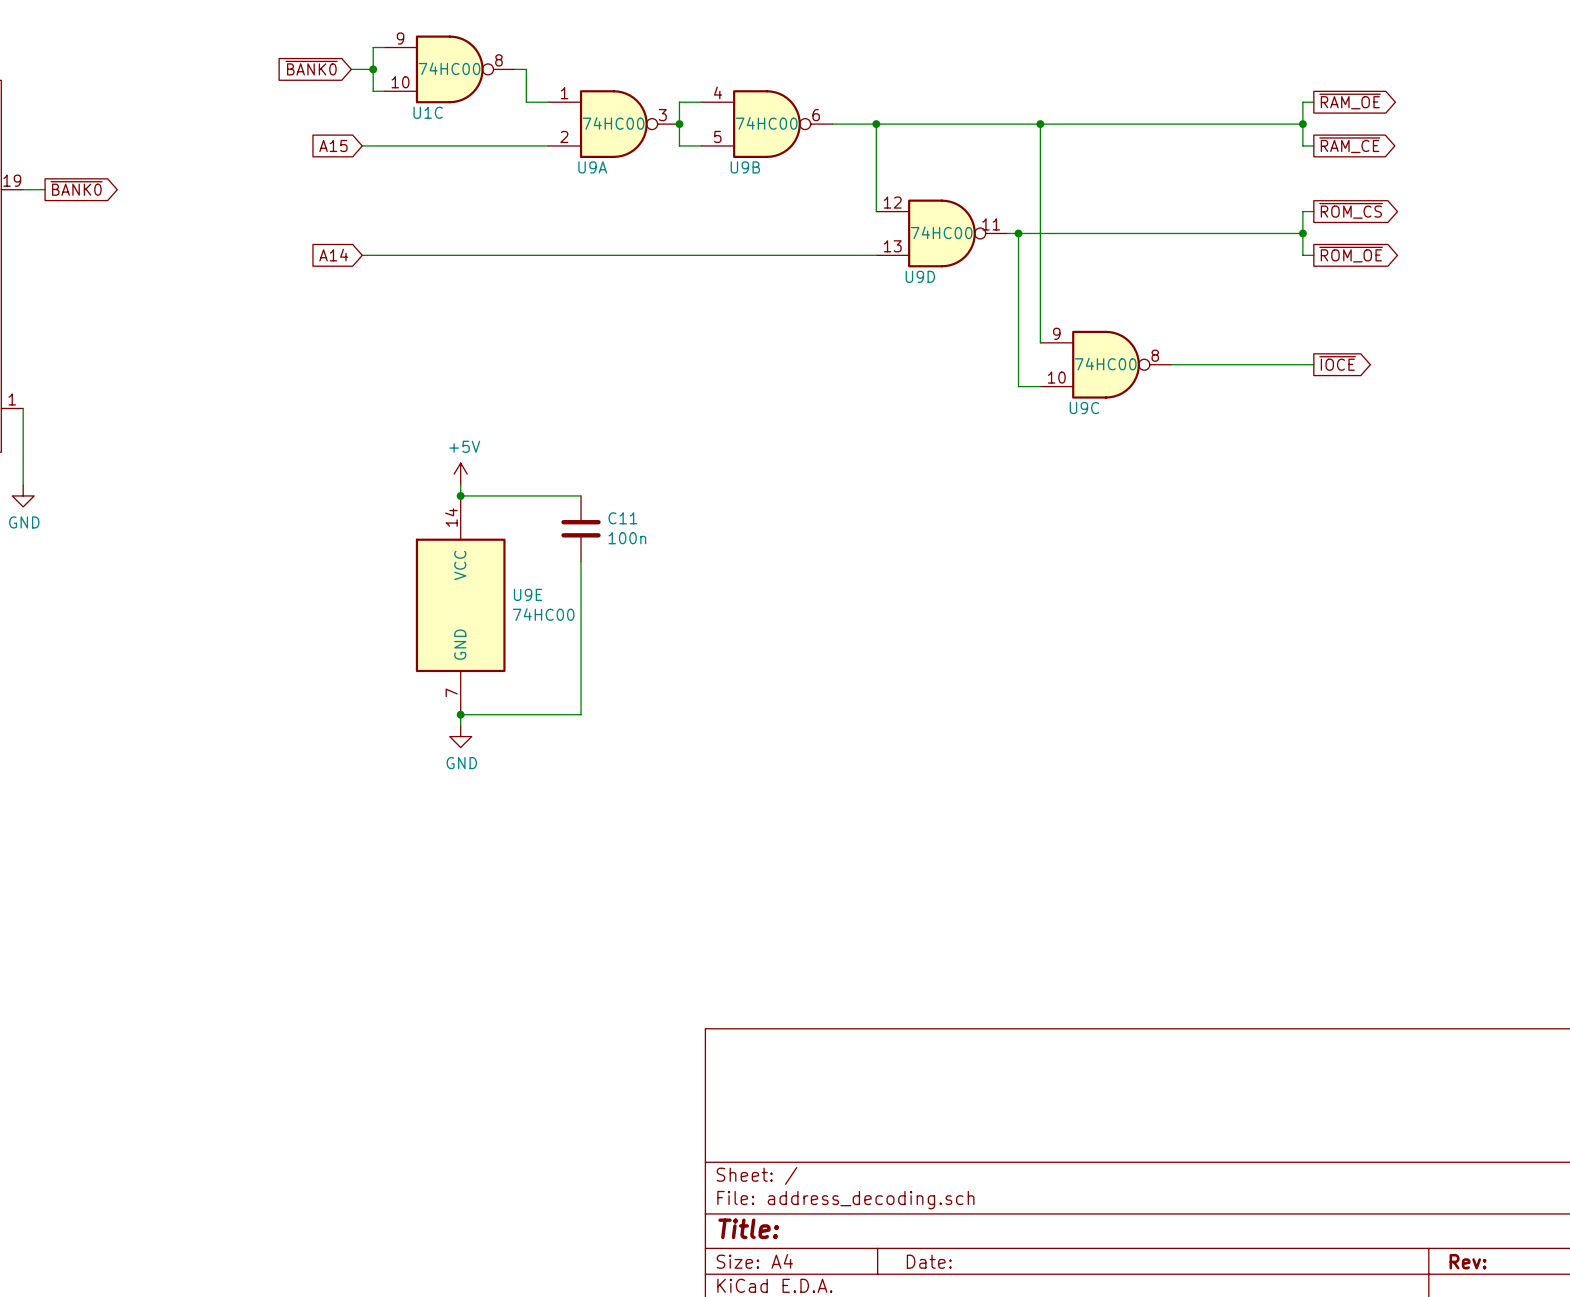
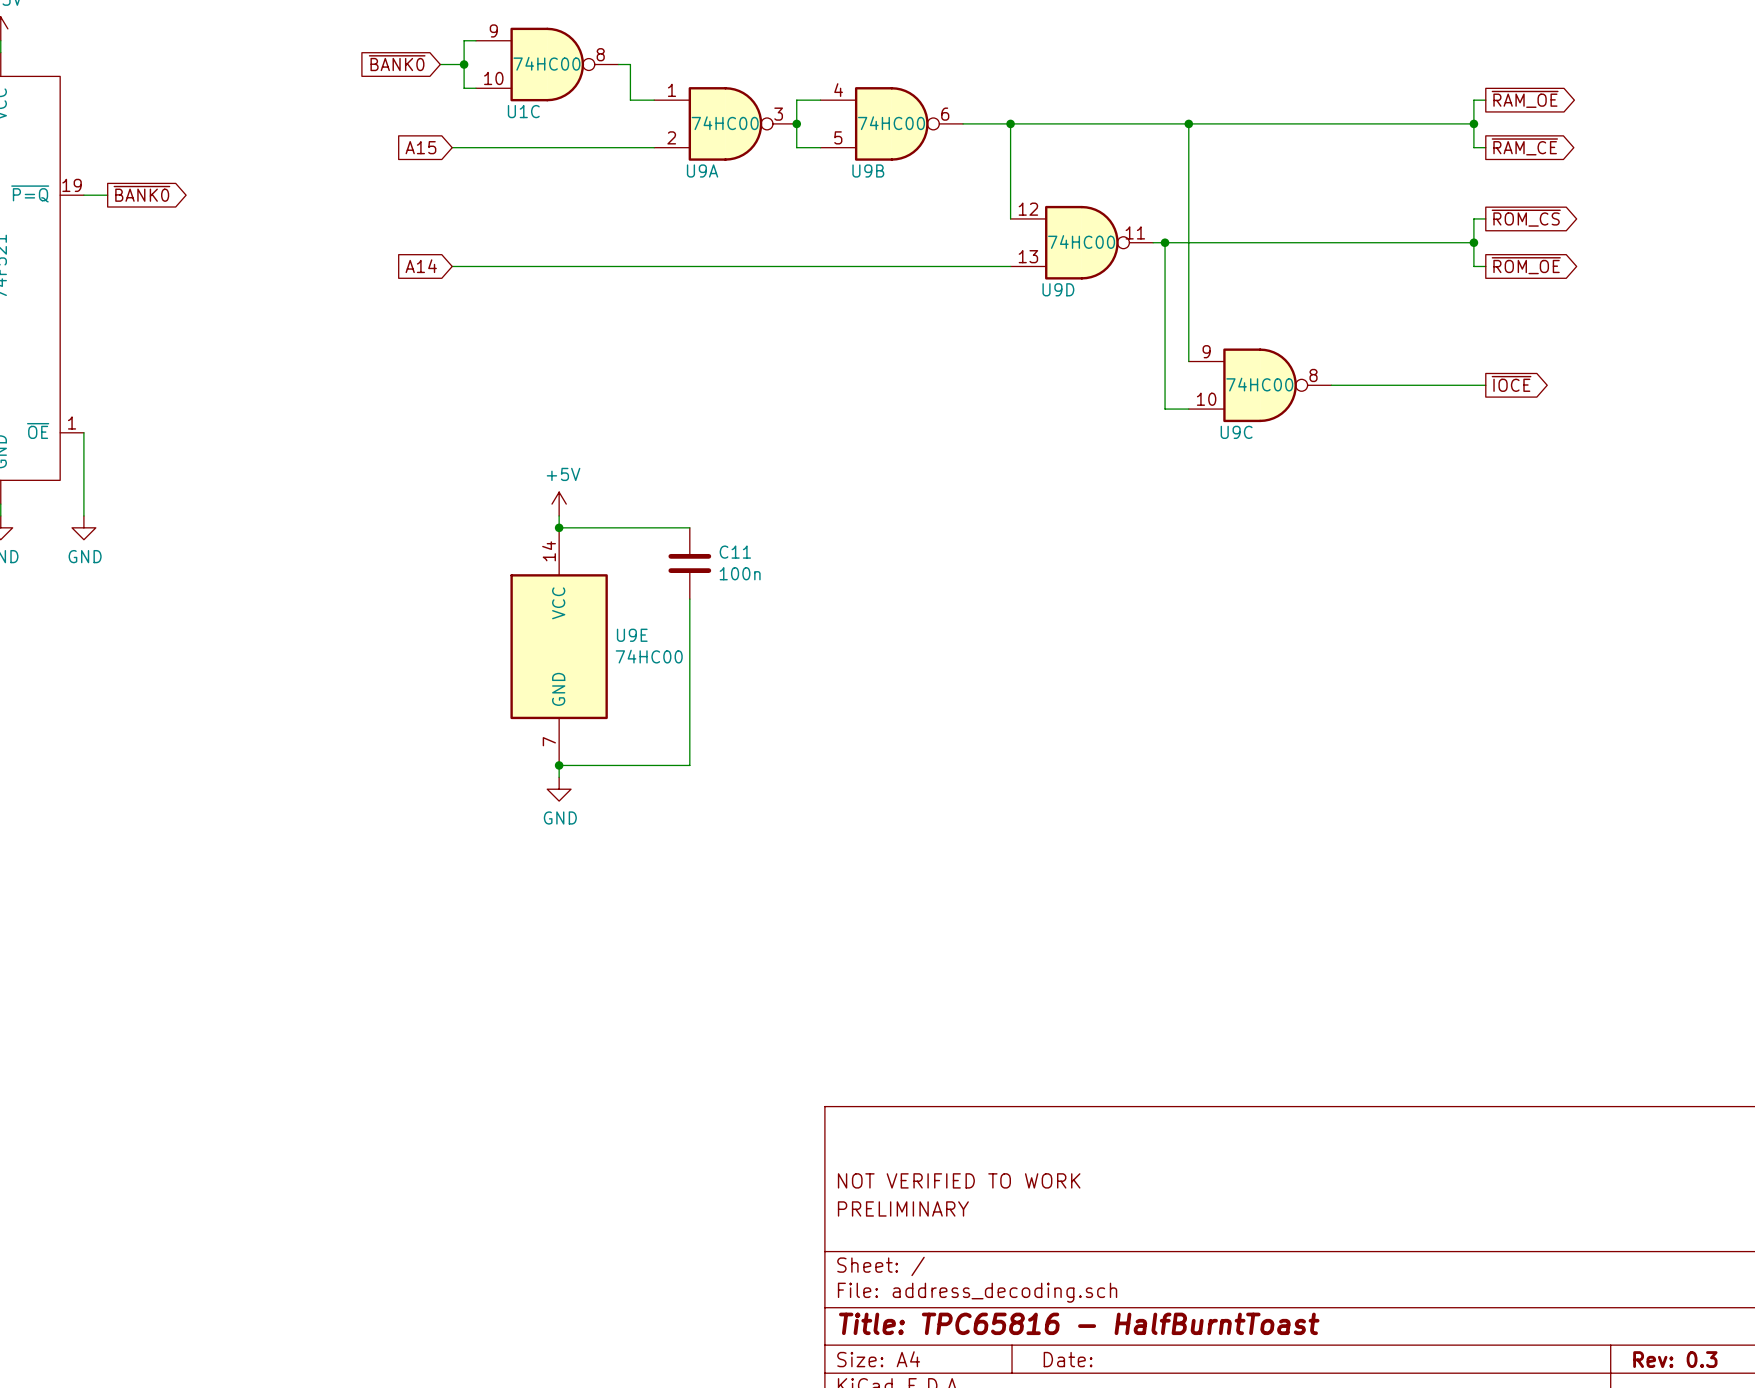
title block: none -> NOT VERIFIED TO WORK (959, 1180)
title block: none -> PRELIMINARY (903, 1208)
title block: Title: (748, 1228) -> Title: TPC65816 - HalfBurntToast (1079, 1323)
title block: Rev: (1468, 1261) -> Rev: 0.3 (1675, 1359)

